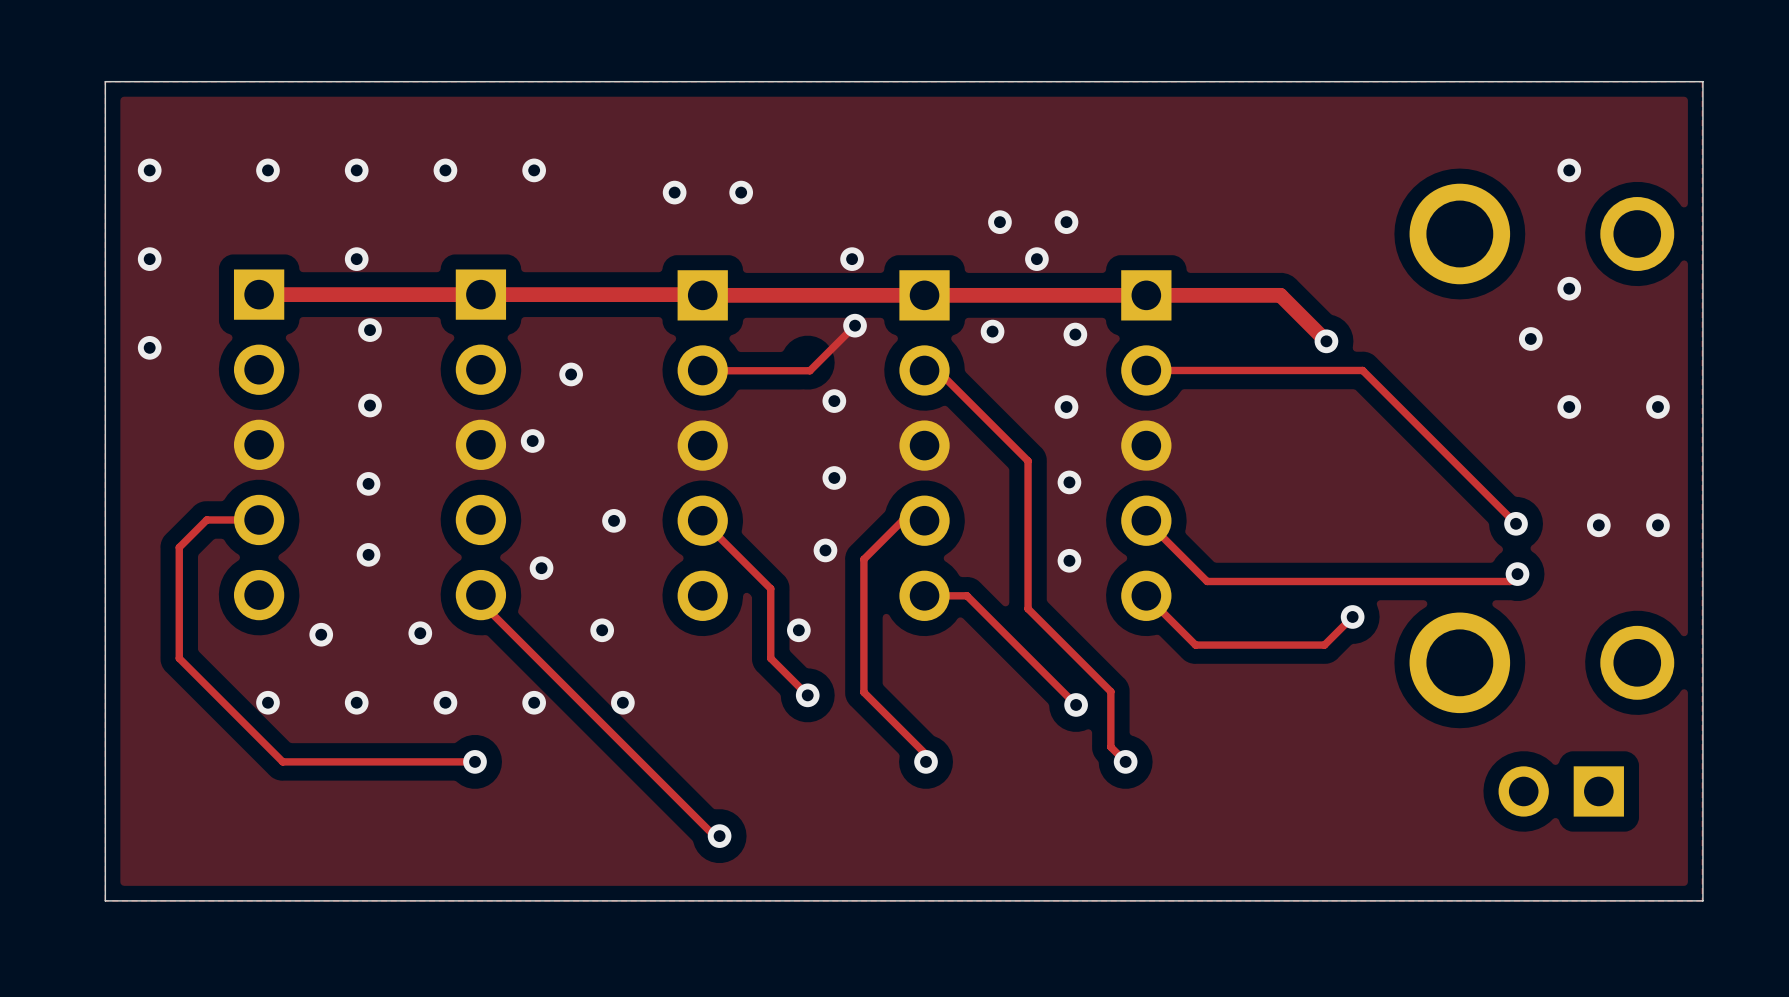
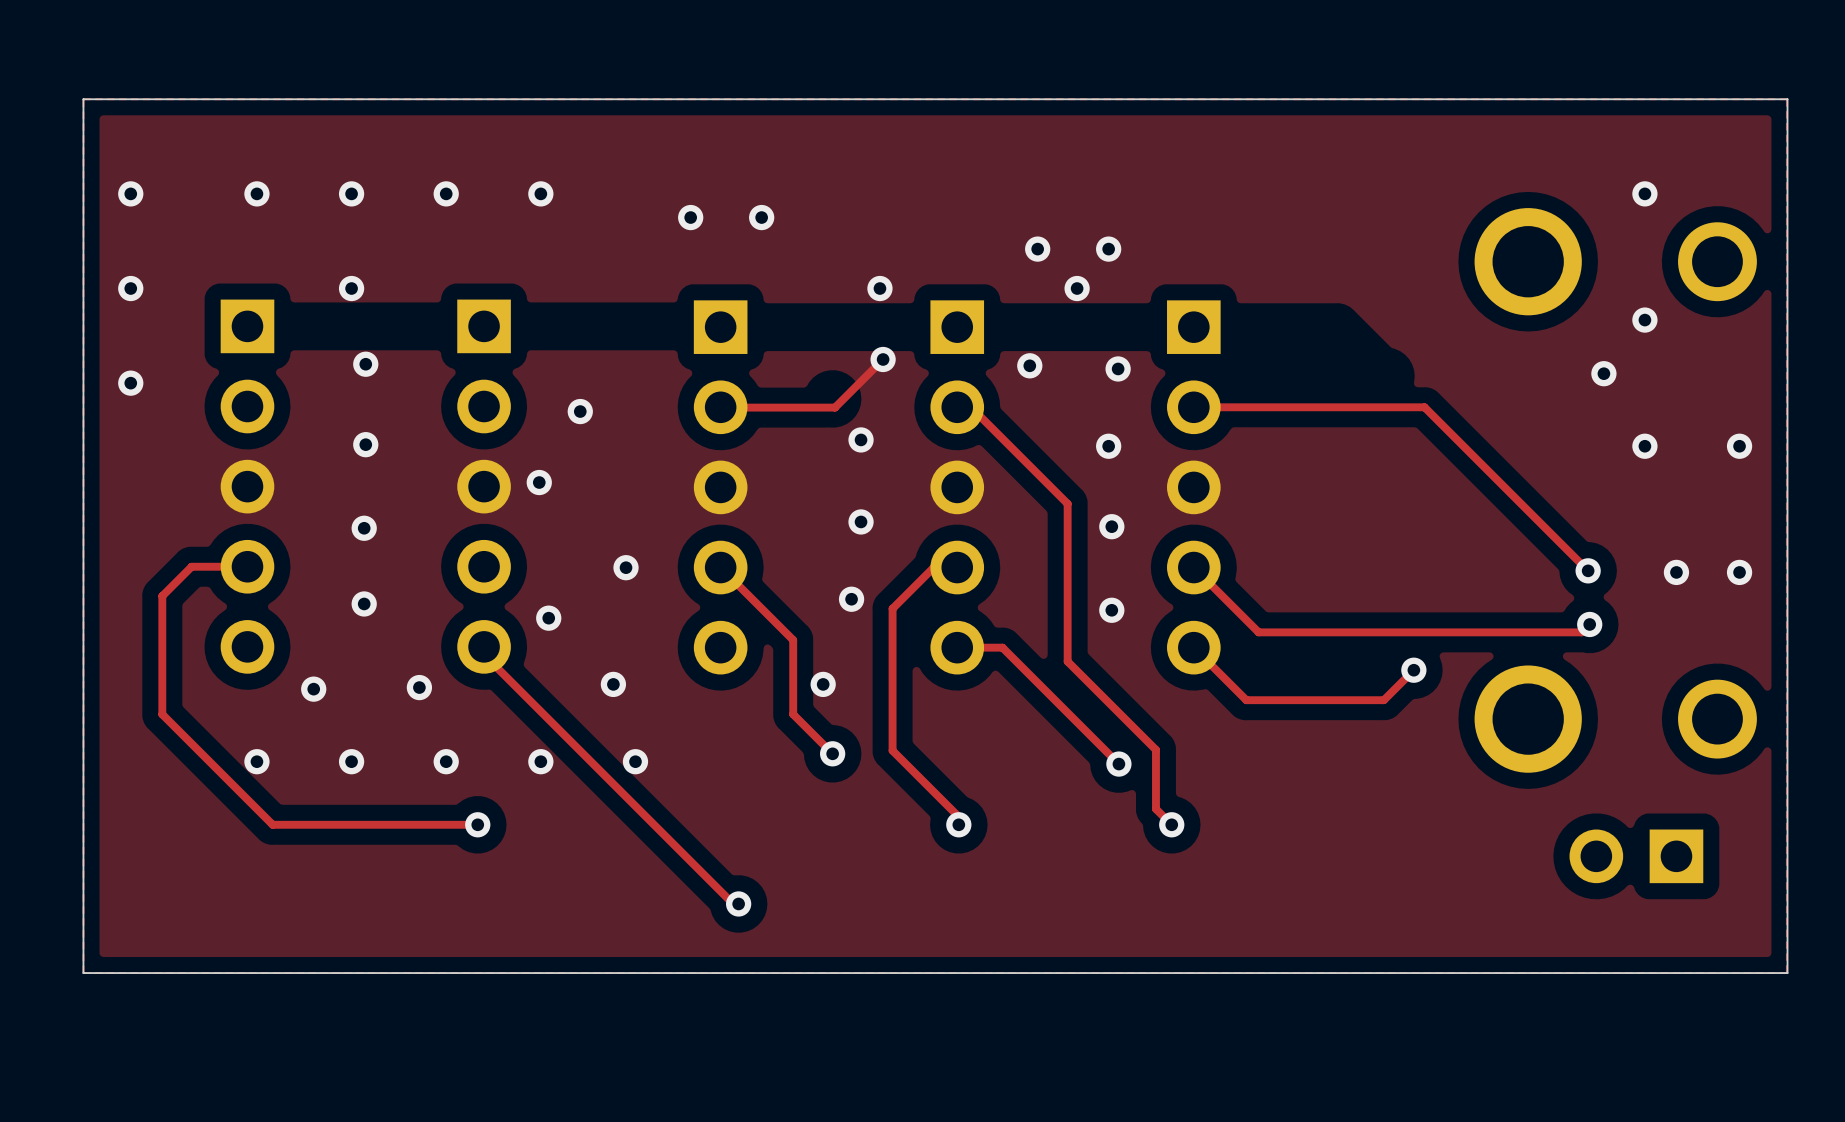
track: (259, 294) (701, 294) -> none
track: (702, 295) (1280, 295) (1326, 341) -> none
via: (1326, 341) -> none

